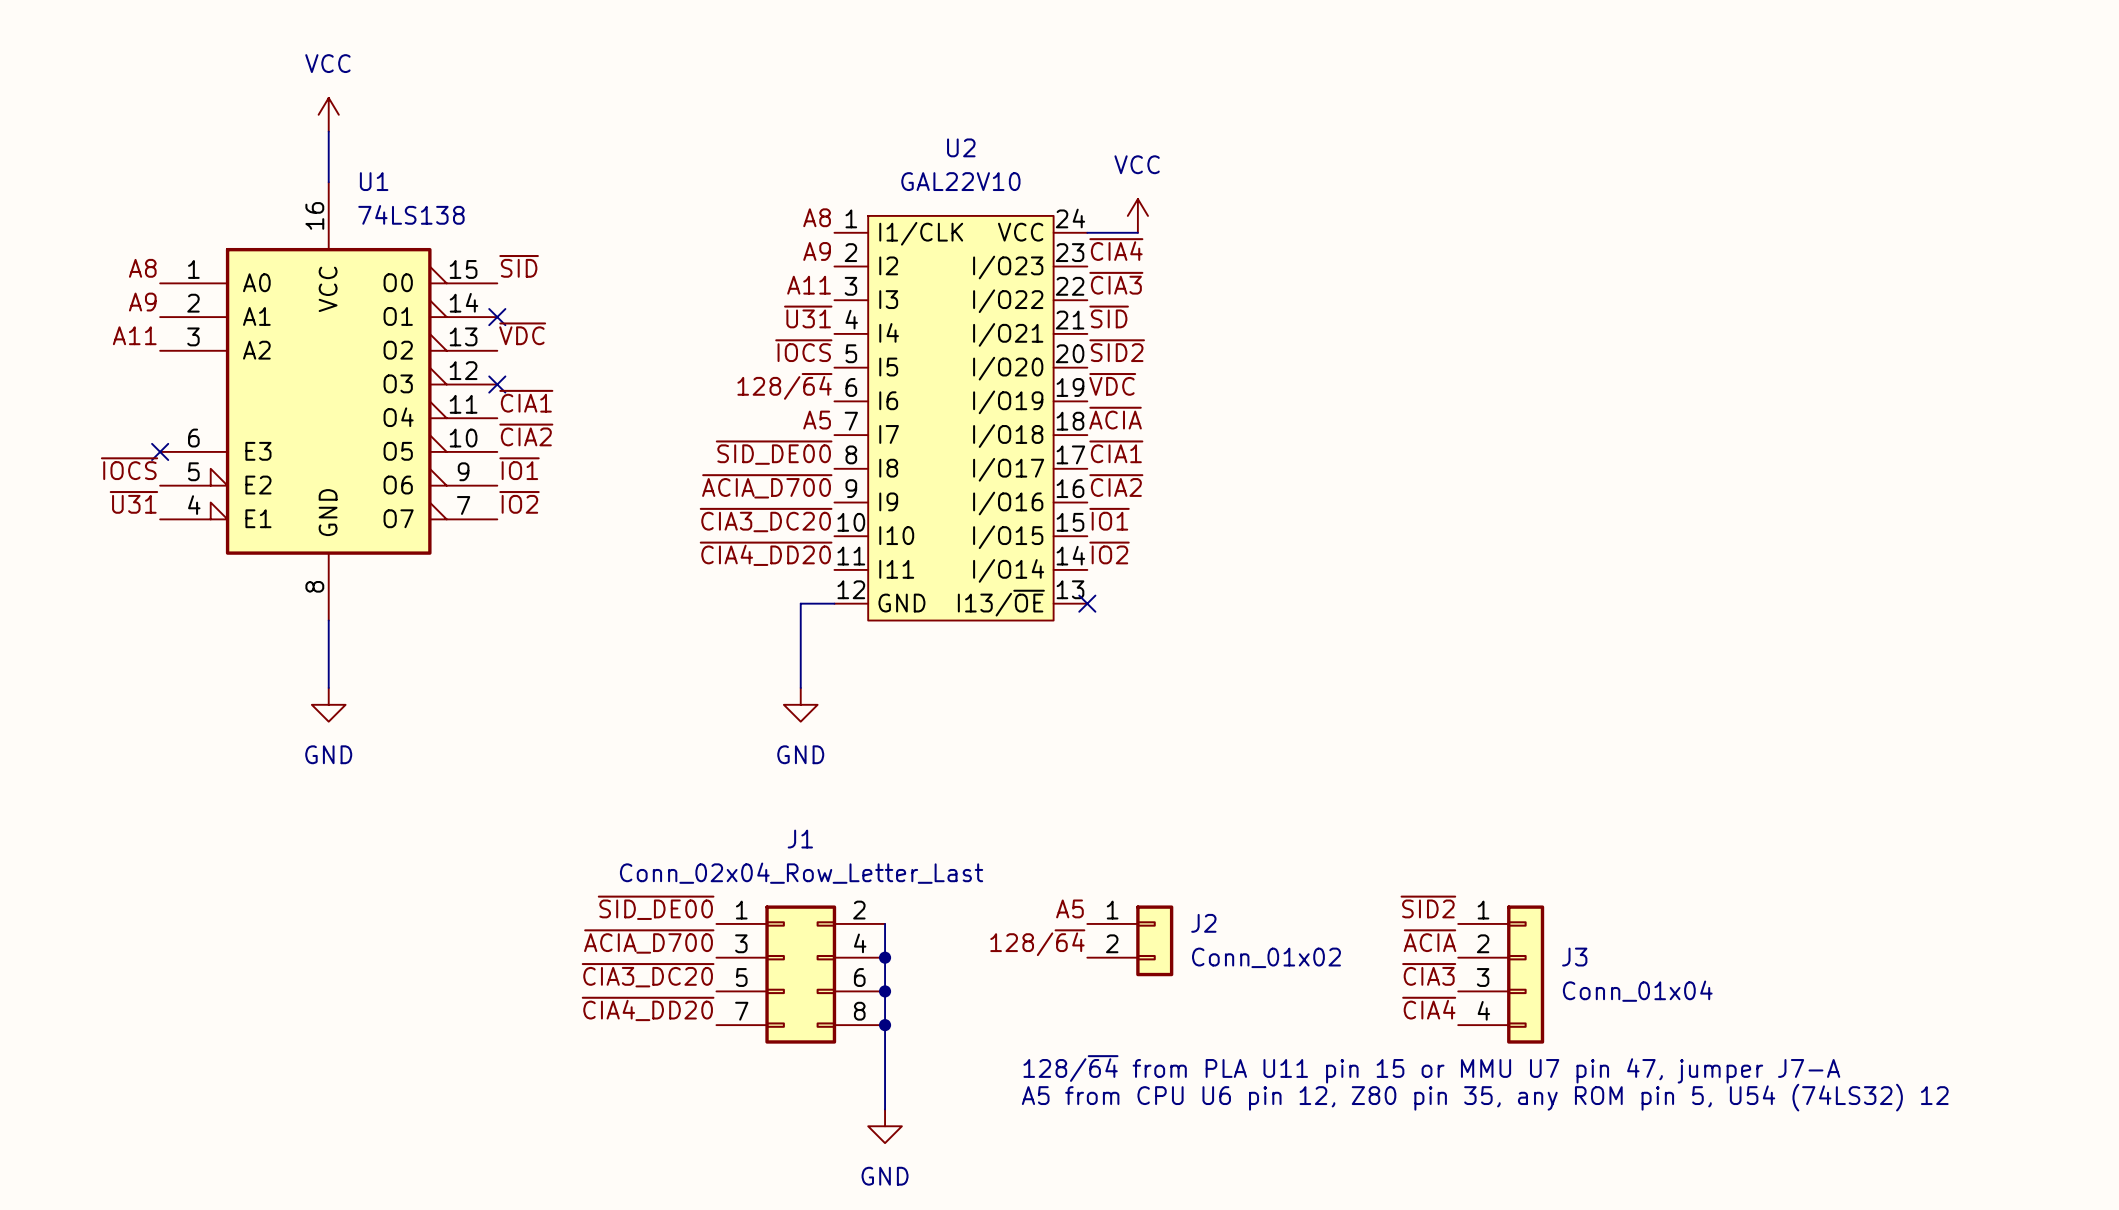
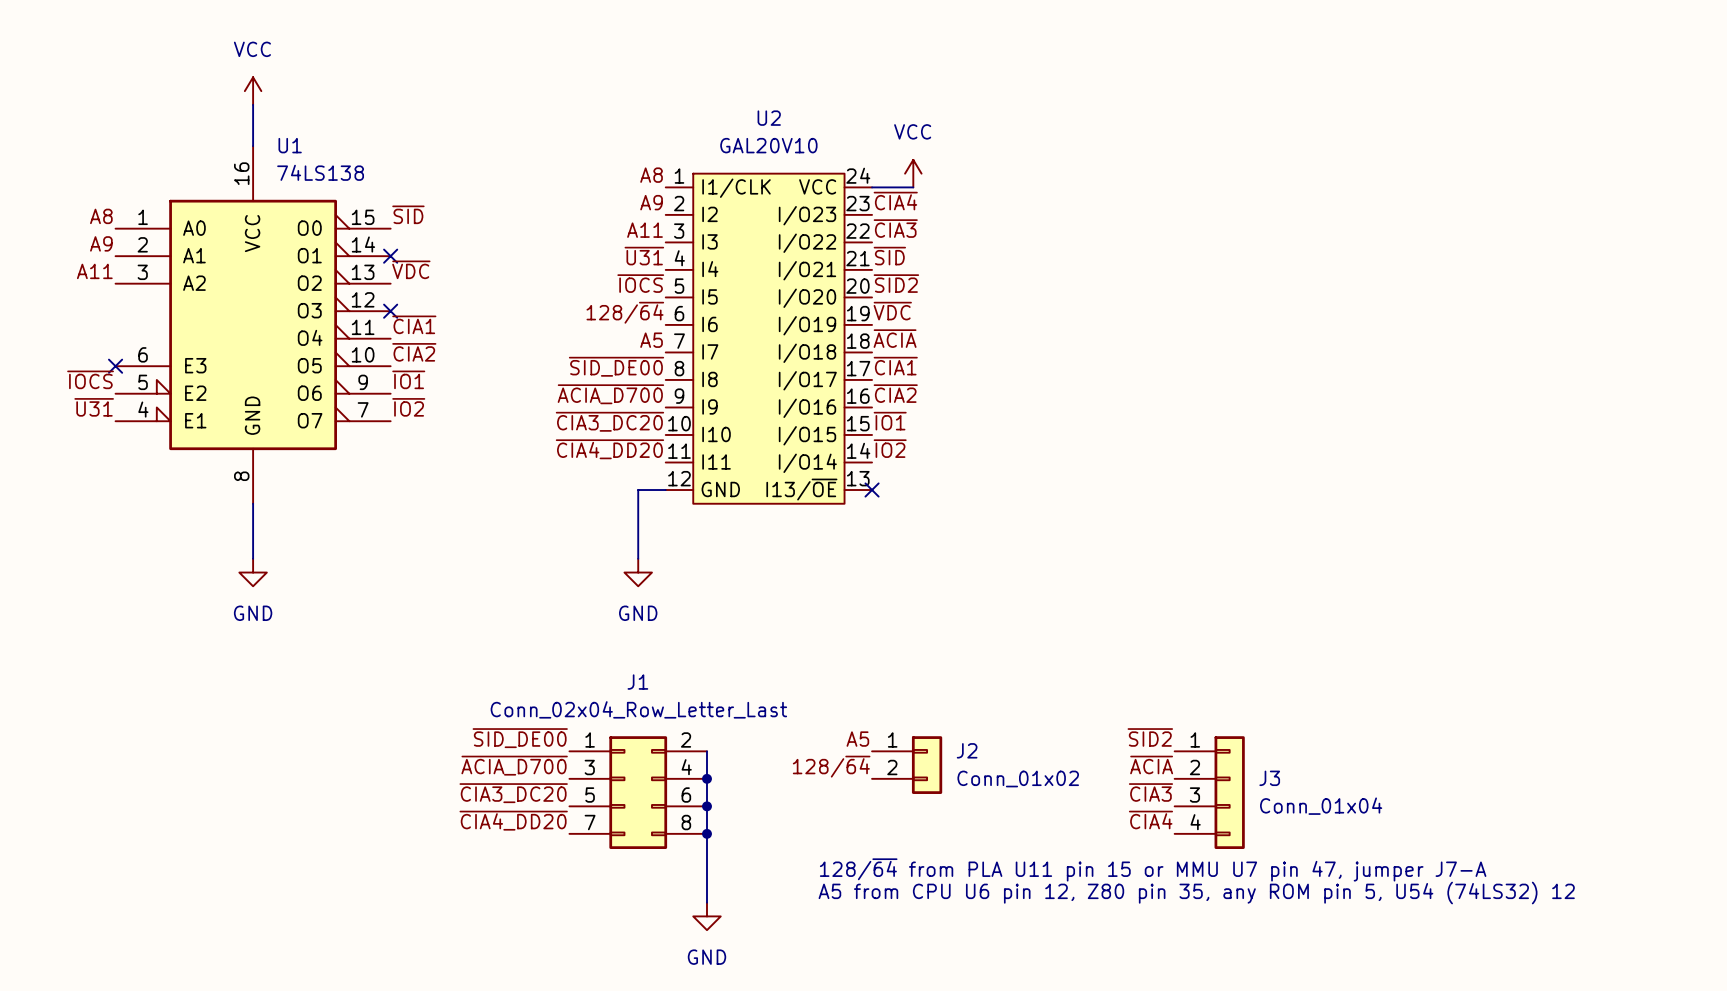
U2 value: GAL22V10 (960, 181) -> GAL20V10 (768, 145)

